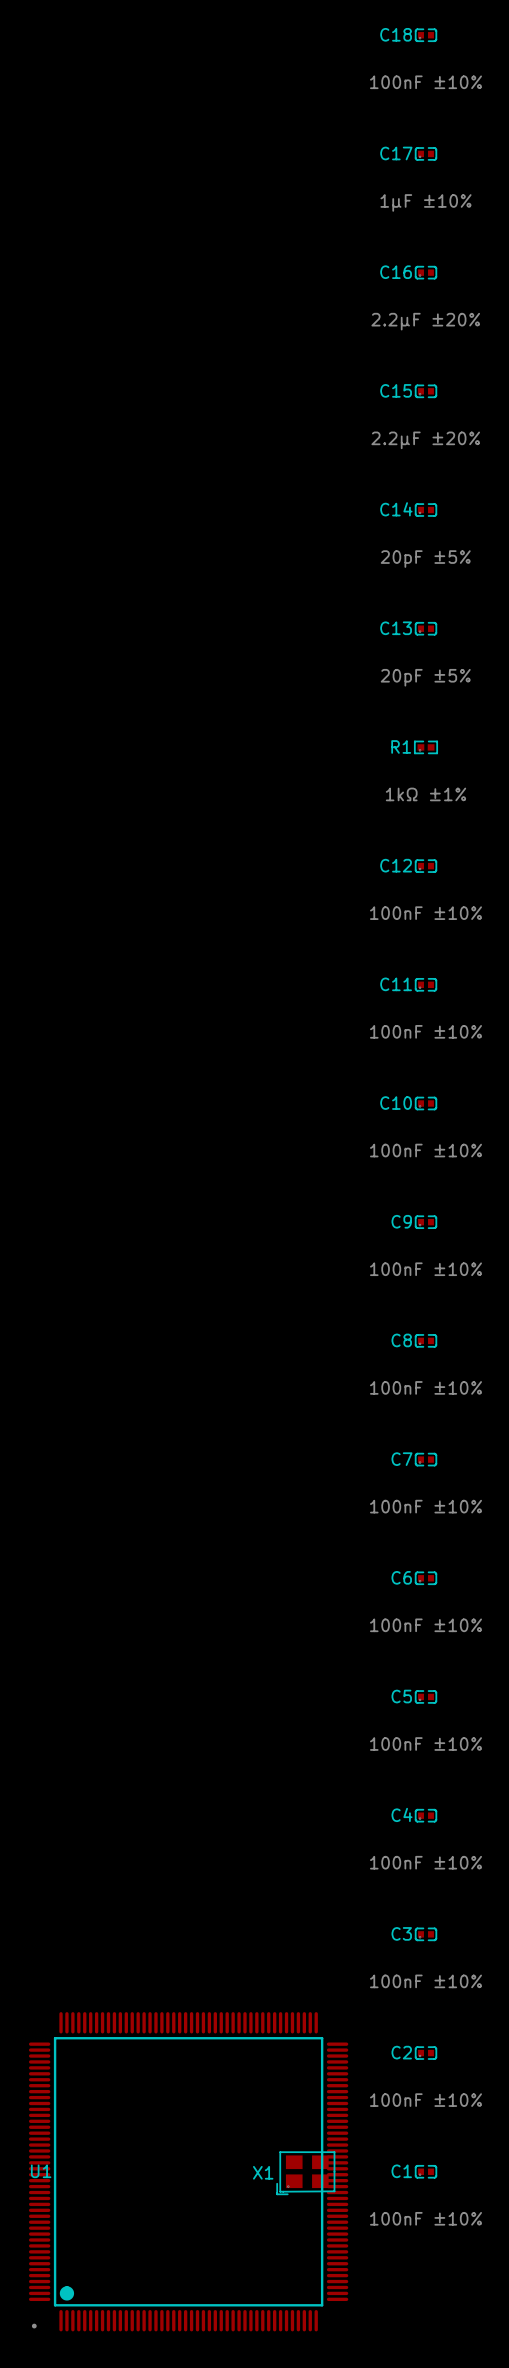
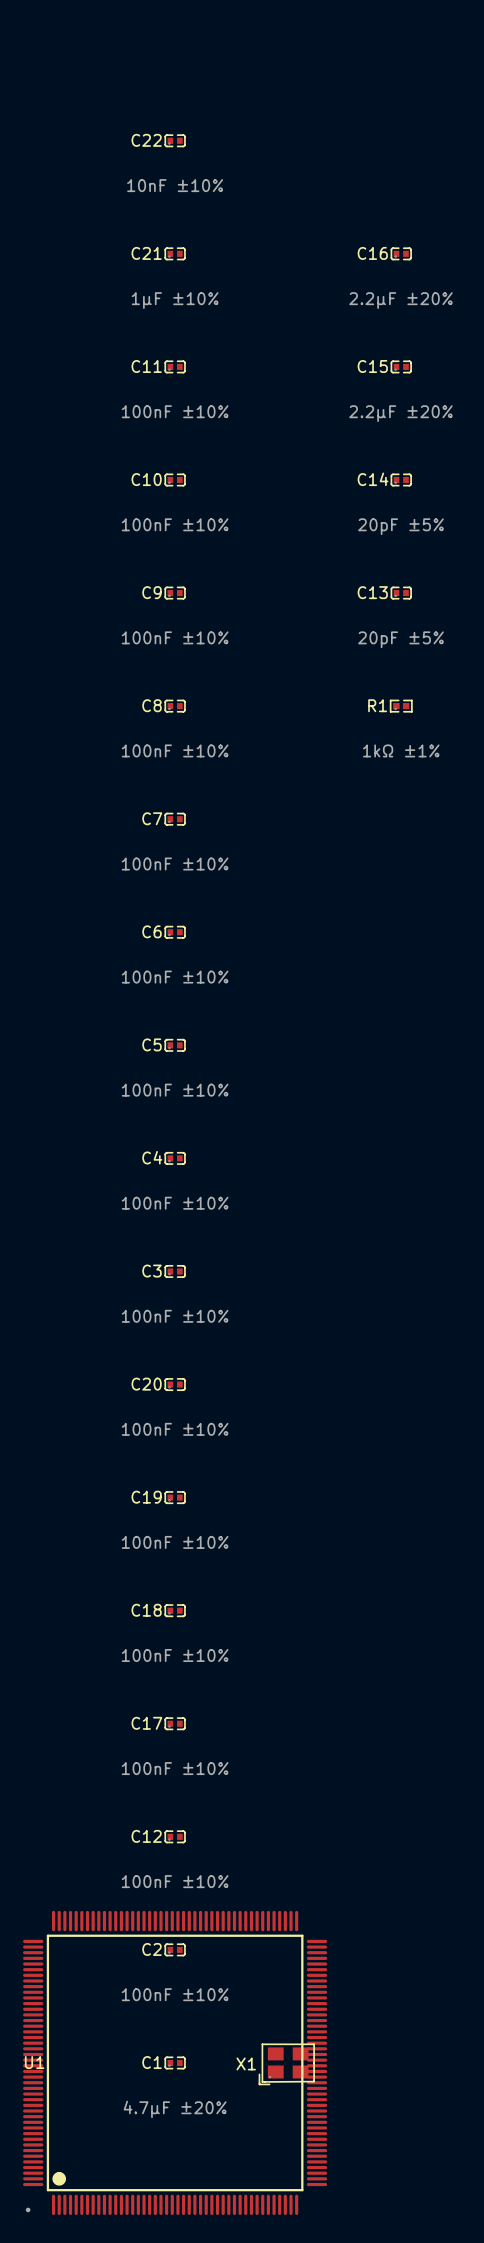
C18 position: (426, 35) -> (175, 1610)
C22: none -> 10nF ±10% (175, 140)
C17 position: (426, 153) -> (175, 1723)
C17 value: 1µF ±10% (426, 202) -> 100nF ±10% (175, 1768)
C21: none -> 1µF ±10% (175, 253)
C12 position: (426, 866) -> (175, 1836)
C11 position: (426, 984) -> (175, 366)
C10 position: (426, 1103) -> (175, 479)
C9 position: (426, 1222) -> (175, 593)
C8 position: (426, 1340) -> (175, 706)
C20: none -> 100nF ±10% (175, 1384)
C7 position: (426, 1459) -> (175, 819)
C19: none -> 100nF ±10% (175, 1497)
C6 position: (426, 1578) -> (175, 932)
C5 position: (426, 1696) -> (175, 1045)
C4 position: (426, 1815) -> (175, 1158)
C3 position: (426, 1934) -> (175, 1271)
C2 position: (426, 2053) -> (175, 1949)
C1 position: (426, 2171) -> (175, 2062)
C1 value: 100nF ±10% (426, 2218) -> 4.7µF ±20% (175, 2109)

